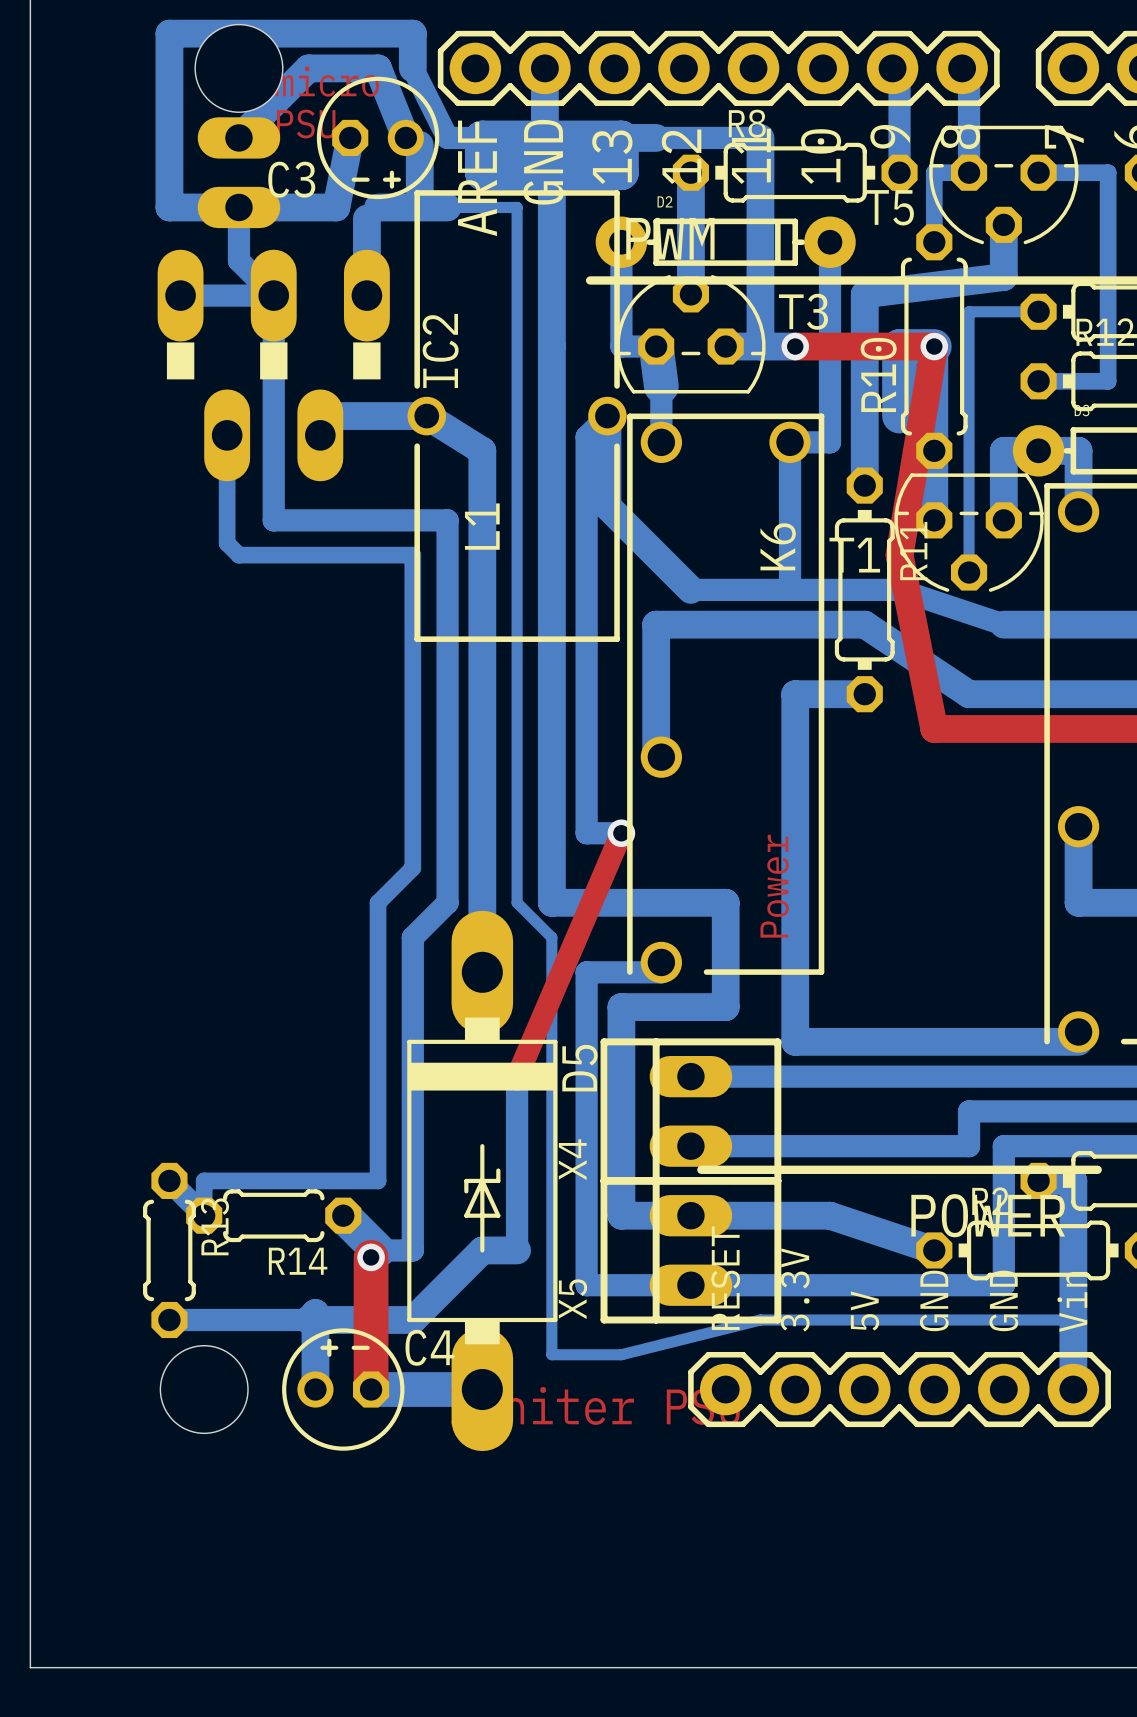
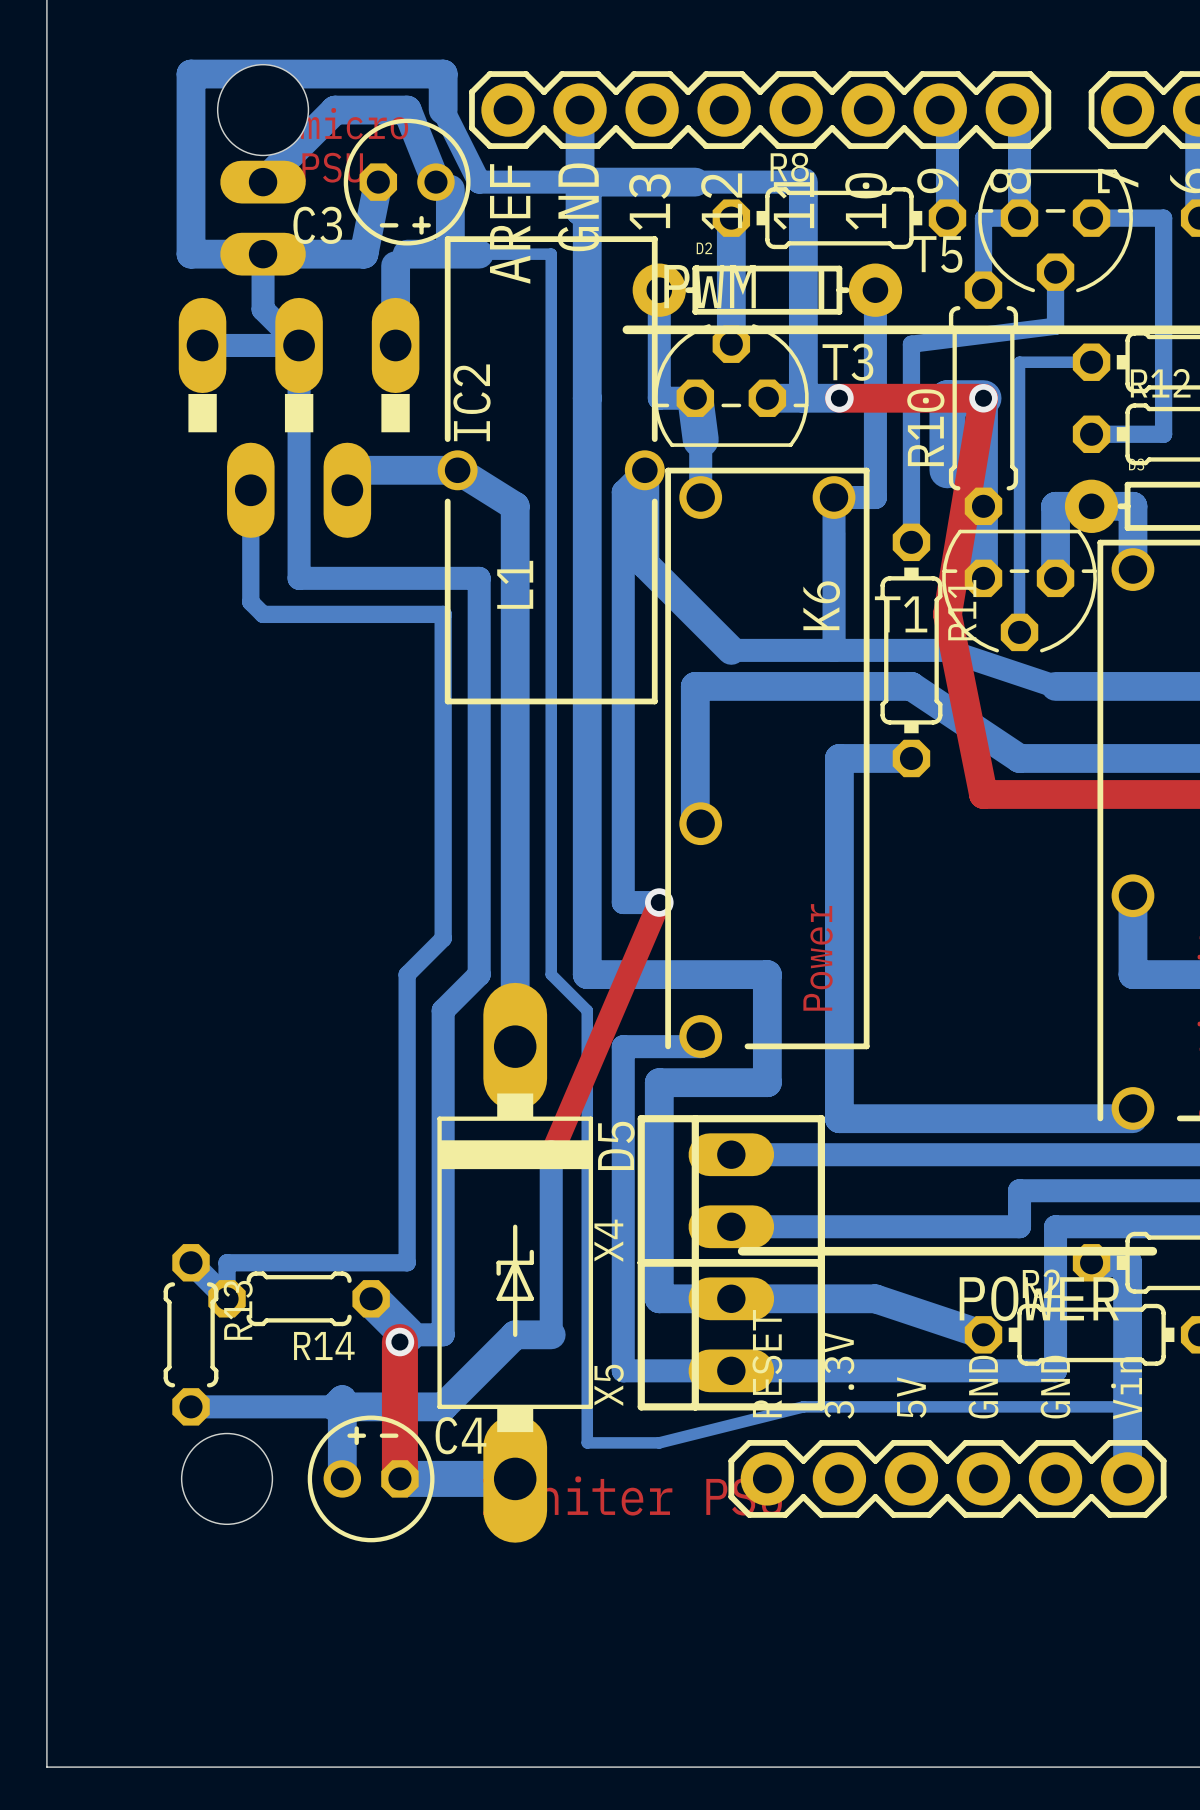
bottom track: (482, 137) (482, 172) (621, 172) (621, 137) (482, 137) -> none
bottom track width: thick (1003, 224) (1003, 277) (864, 294) (864, 485) -> thin (1055, 272) (1055, 326) (911, 344) (911, 542)

